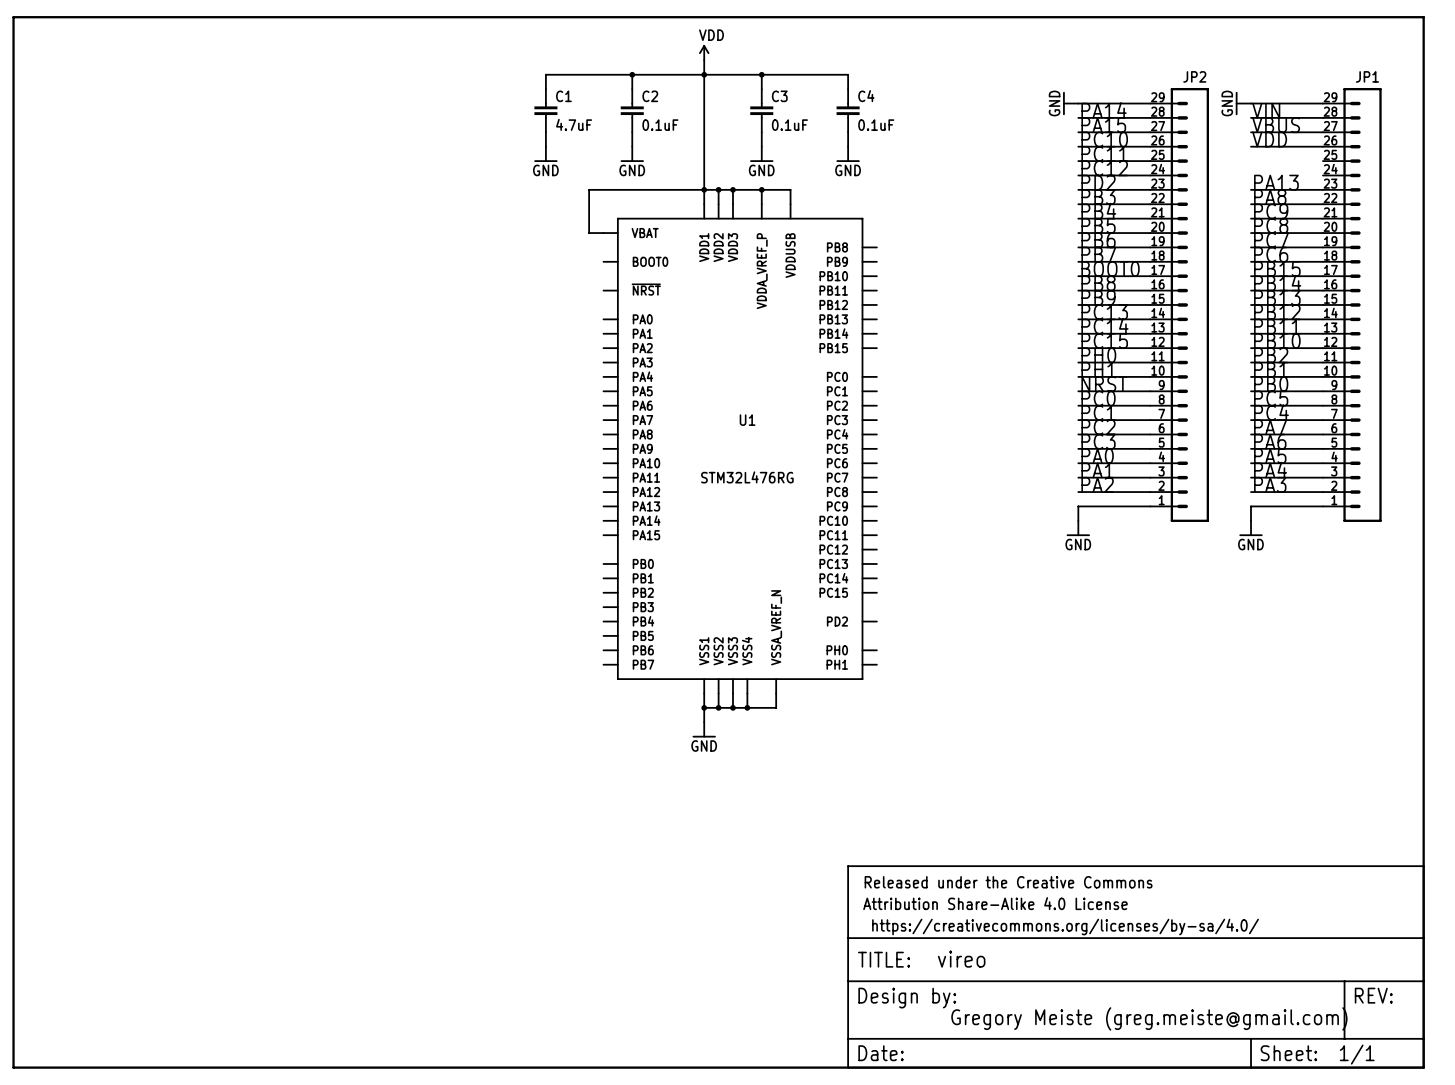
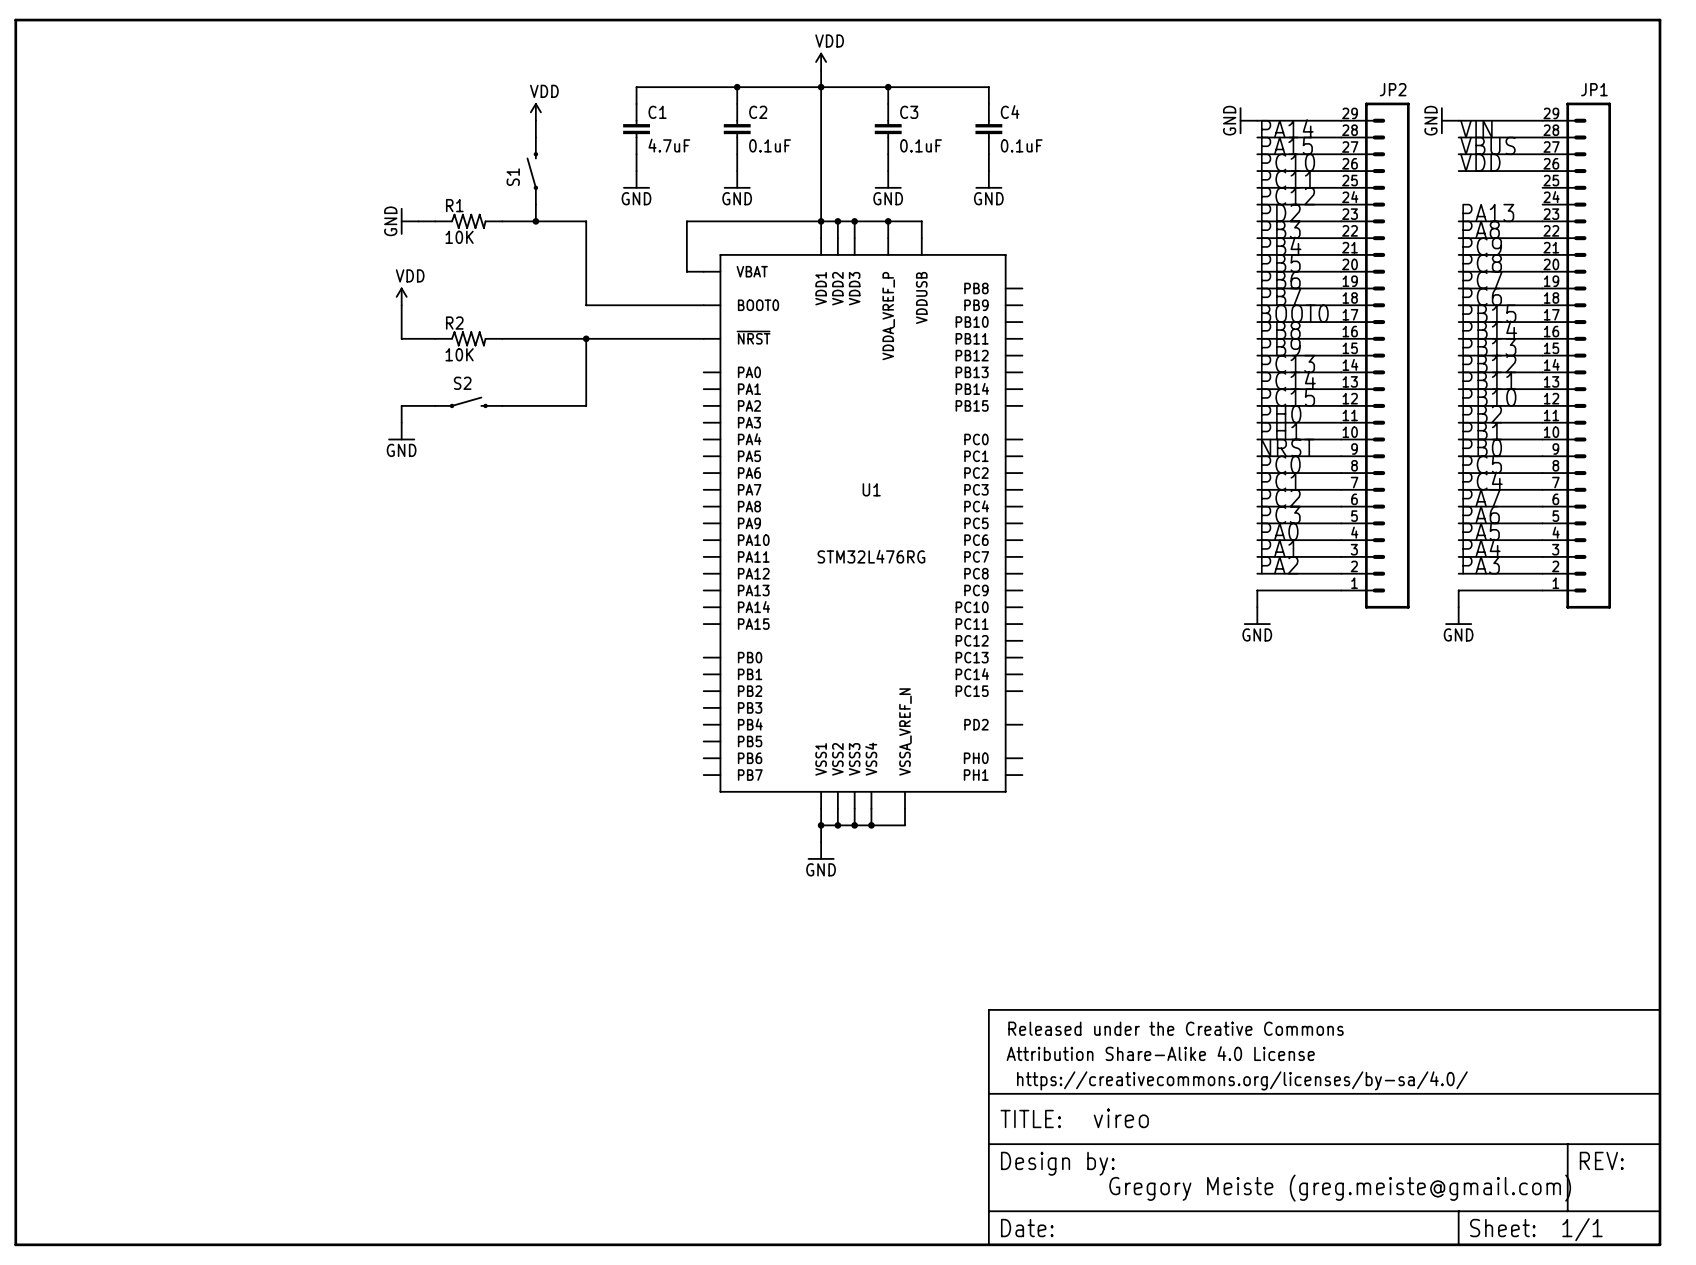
power symbol: none -> VDD (535, 111)
wire: none -> (535, 120) (535, 137)
S1: none -> (532, 171)
wire: none -> (535, 204) (535, 221)
power symbol: none -> GND (409, 221)
wire: none -> (418, 221) (435, 221)
R1: none -> 10K (468, 221)
wire: none -> (502, 221) (586, 221) (586, 305) (703, 305)
junction: none -> (535, 221)
power symbol: none -> VDD (401, 296)
wire: none -> (401, 305) (401, 338) (435, 338)
R2: none -> 10K (468, 338)
wire: none -> (502, 338) (703, 338)
wire: none -> (586, 338) (586, 405) (502, 405)
junction: none -> (586, 338)
S2: none -> (468, 402)
wire: none -> (435, 405) (401, 405) (401, 422)
power symbol: none -> GND (401, 431)

